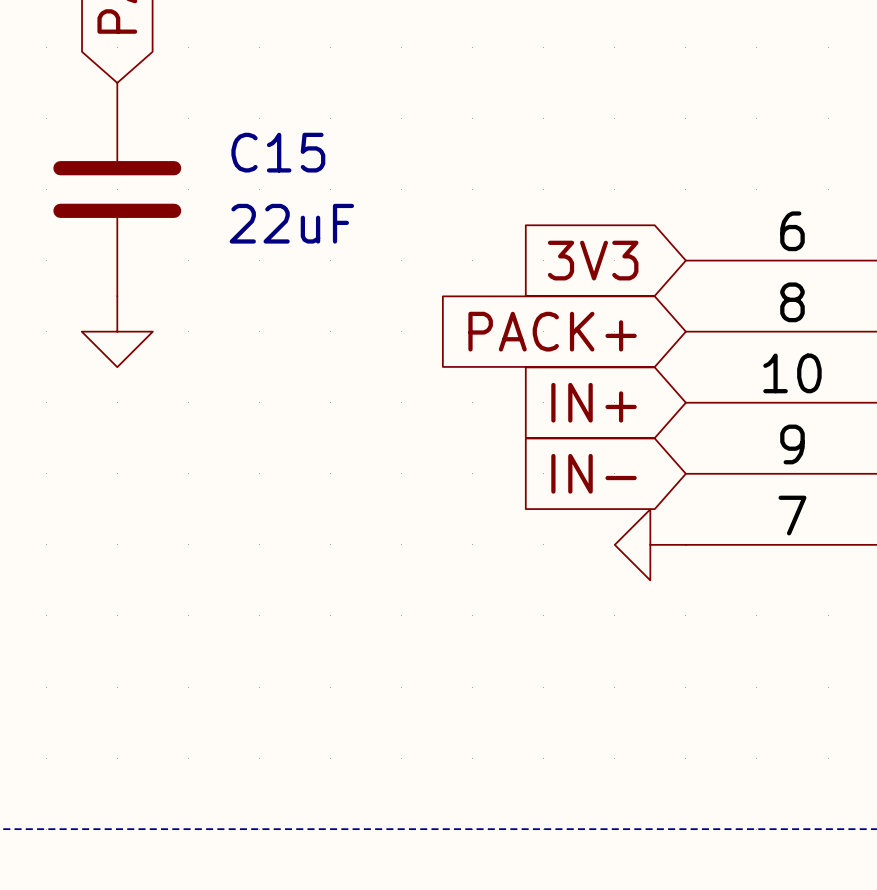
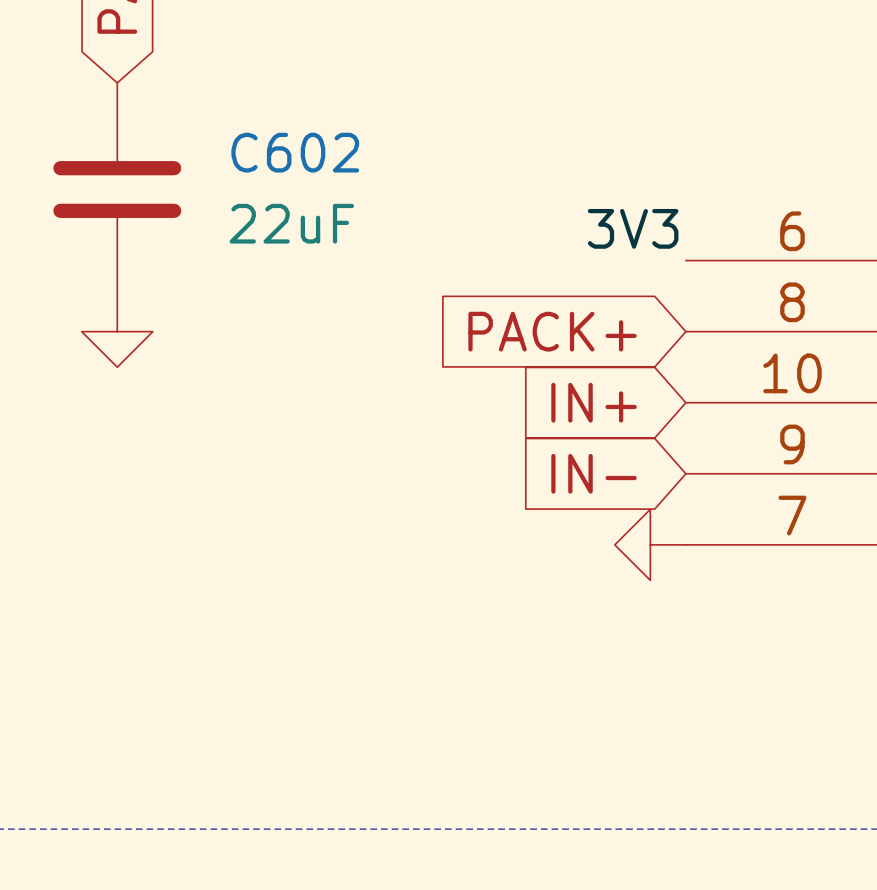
C15 name: C15 (278, 152) -> C602 (295, 152)
label: none -> 3V3 (633, 228)
global label: 3V3 (593, 260) -> none

